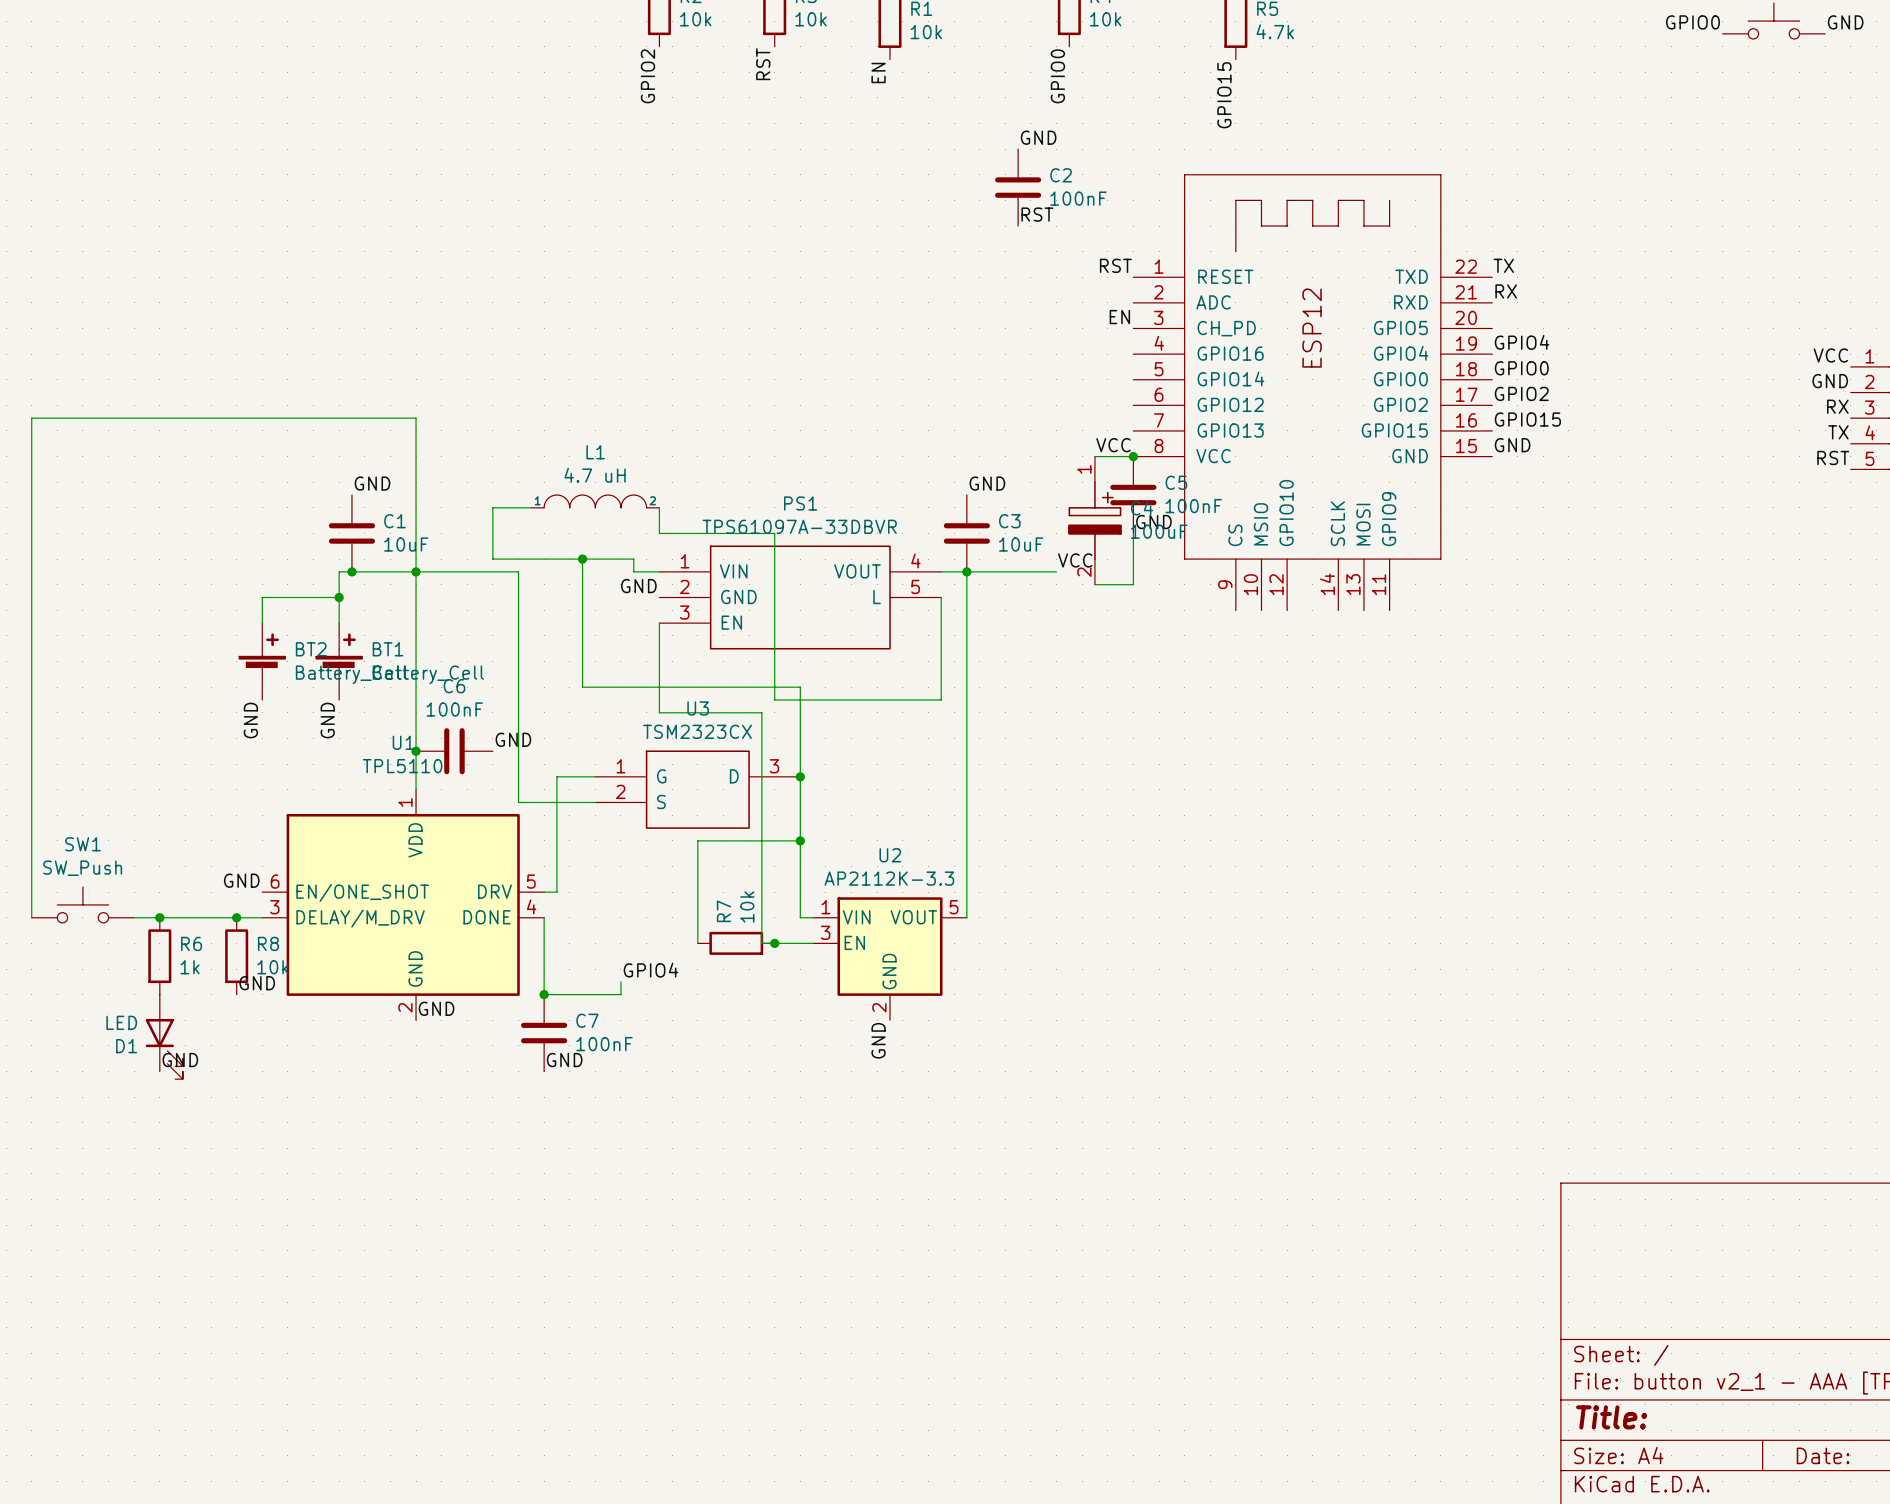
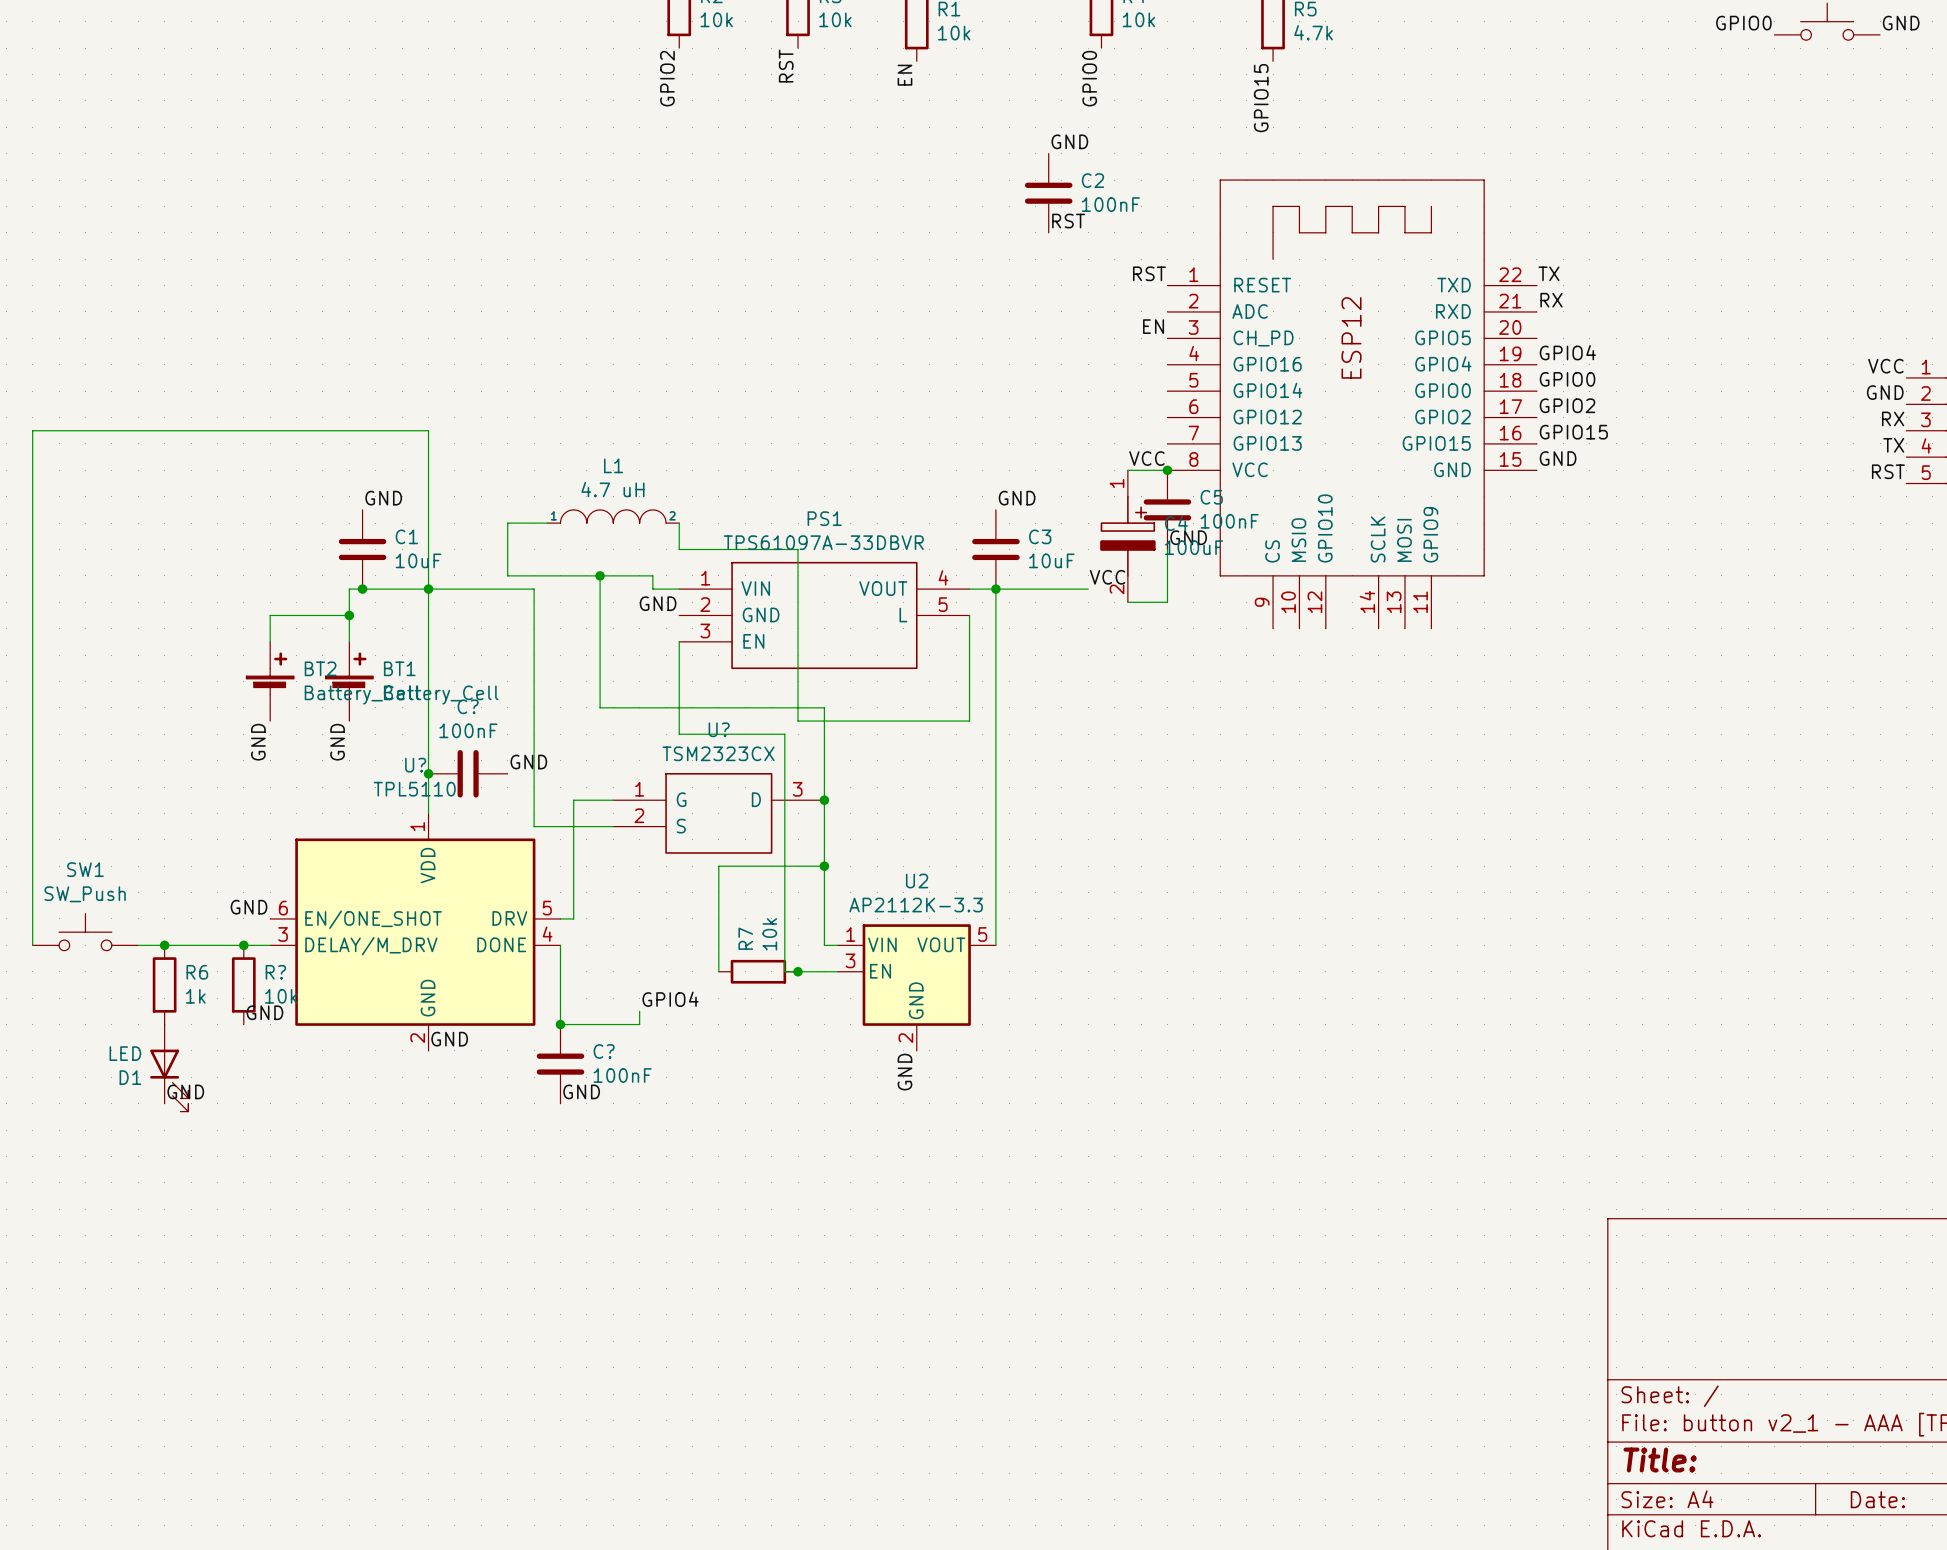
C6 name: C6 (454, 686) -> C? (468, 706)
U3 name: U3 (698, 708) -> U? (719, 729)
U1 name: U1 (403, 742) -> U? (415, 765)
R8 name: R8 (268, 943) -> R? (275, 972)
C7 name: C7 (587, 1020) -> C? (604, 1051)

